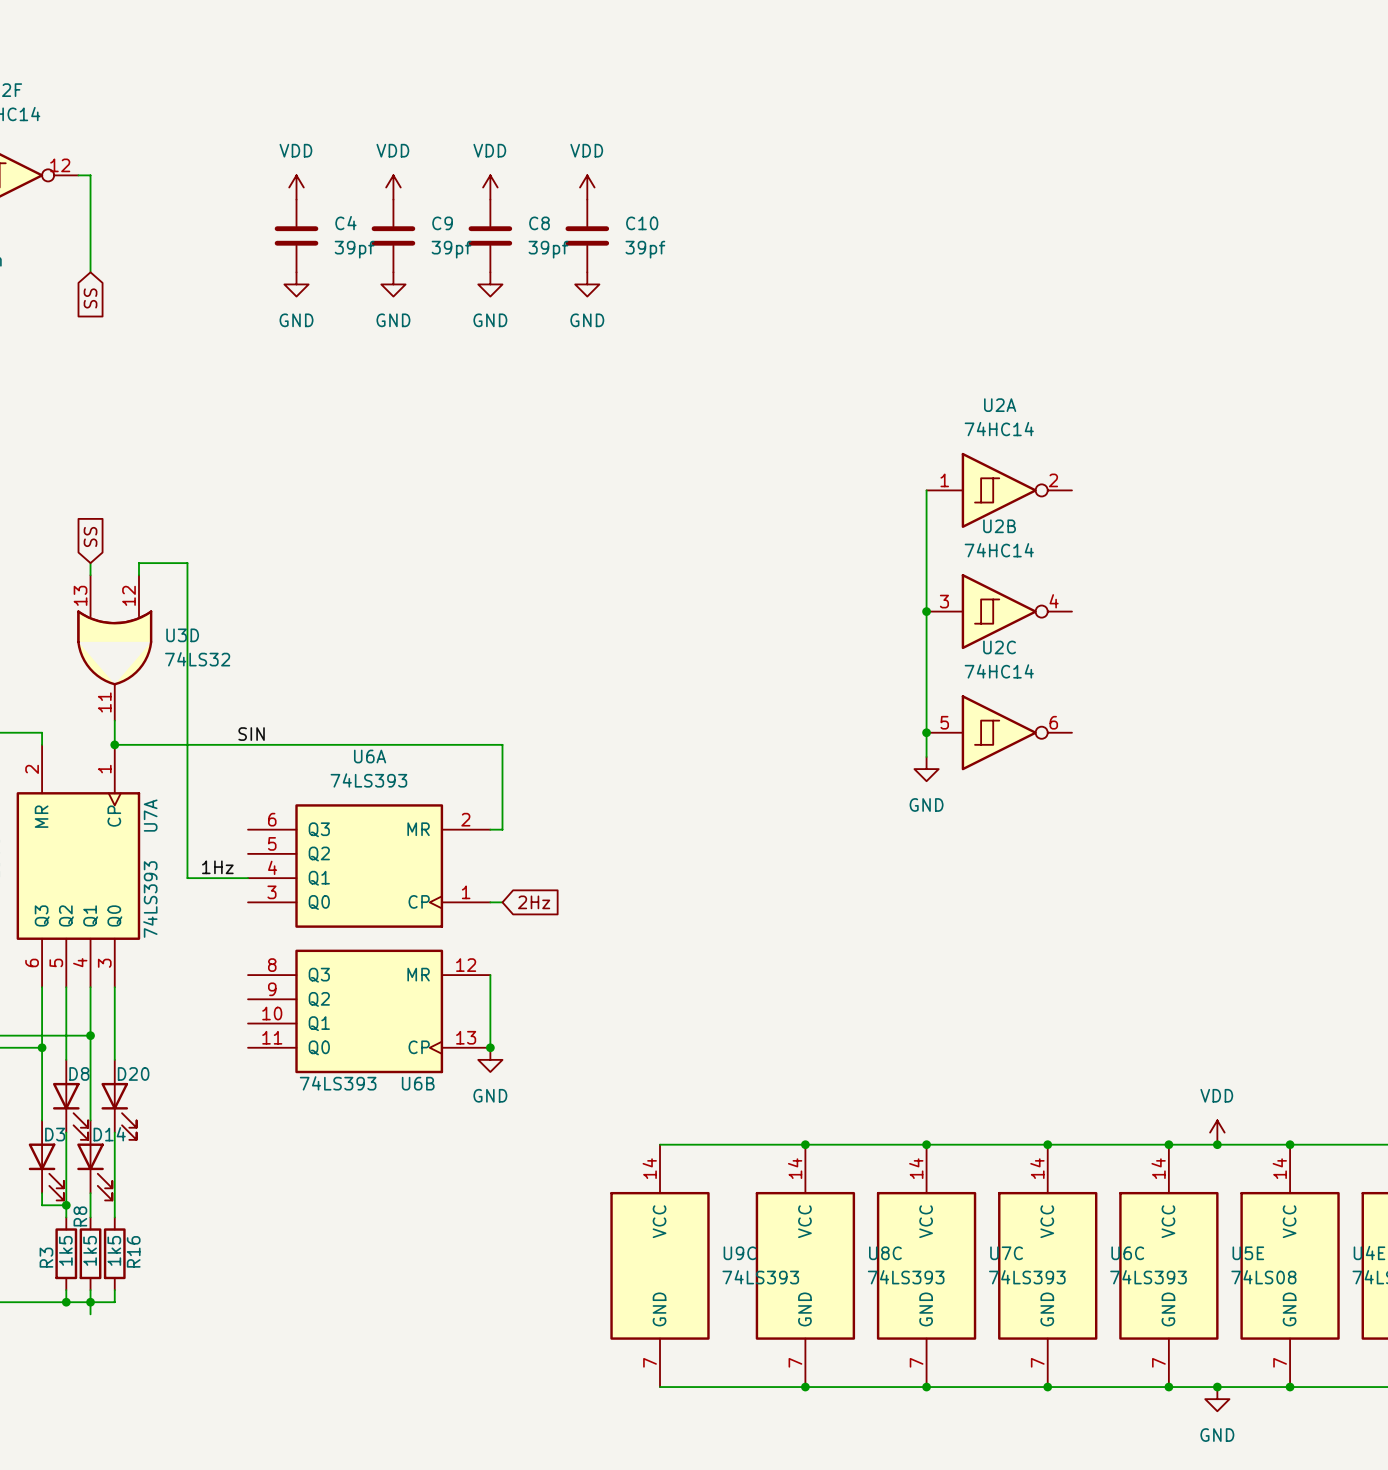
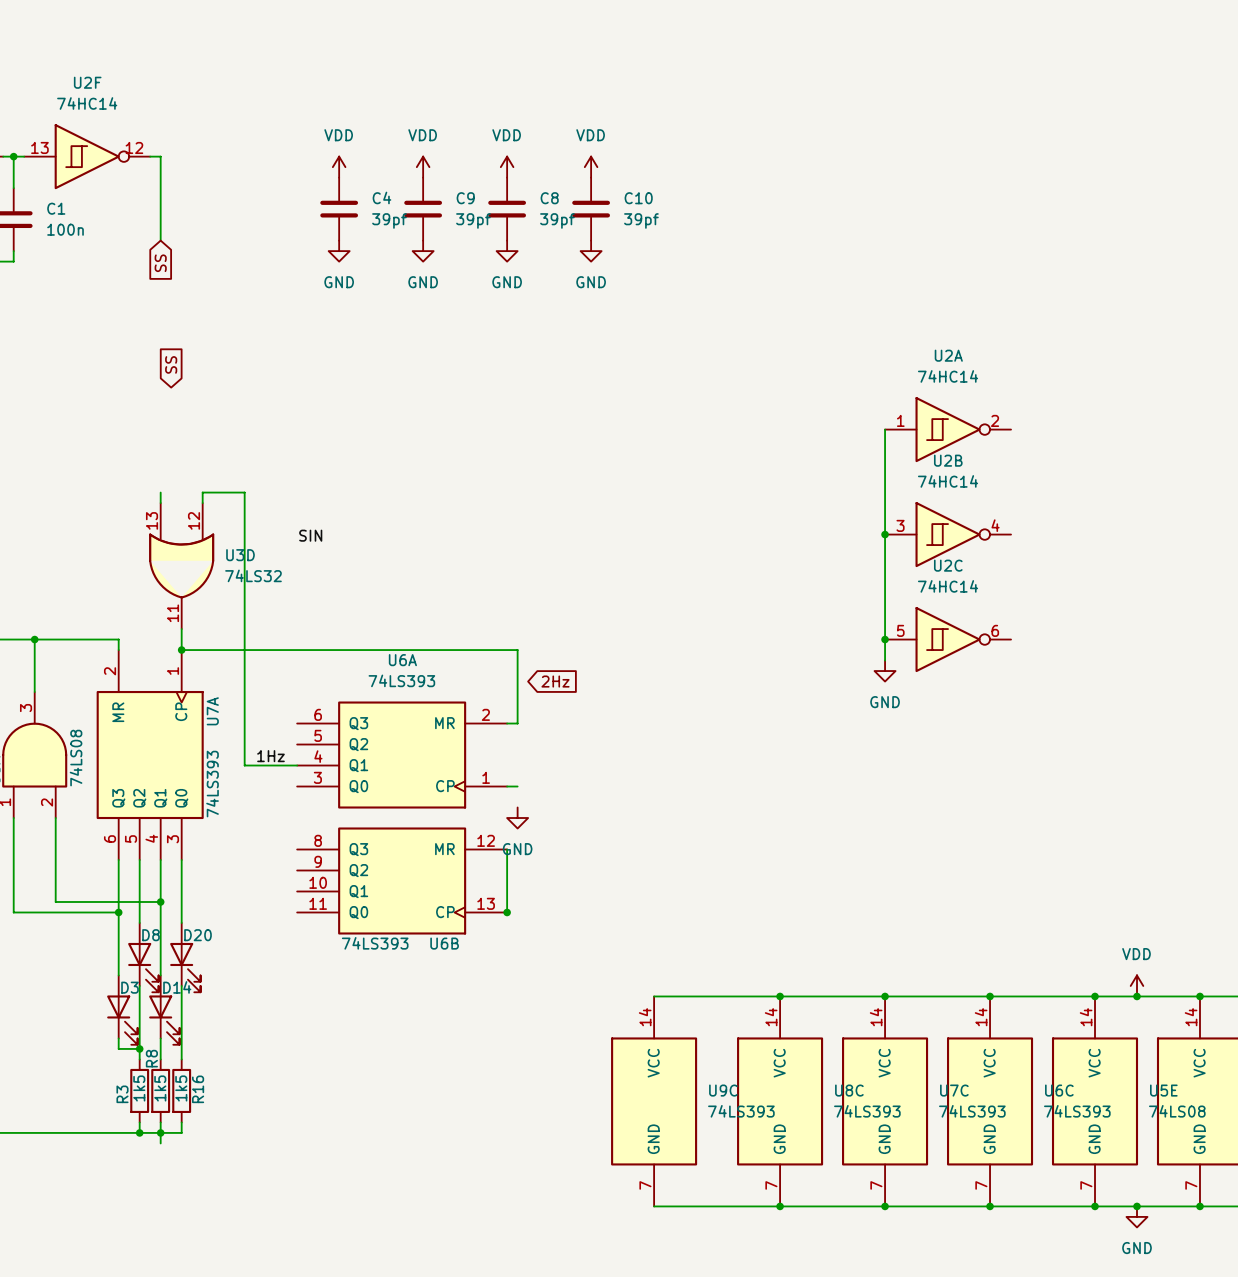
global label position: SS (90, 536) -> SS (171, 364)
label position: SIN (251, 734) -> SIN (310, 535)
global label position: 2Hz (534, 902) -> 2Hz (555, 681)
power symbol position: GND (490, 1059) -> GND (517, 818)

